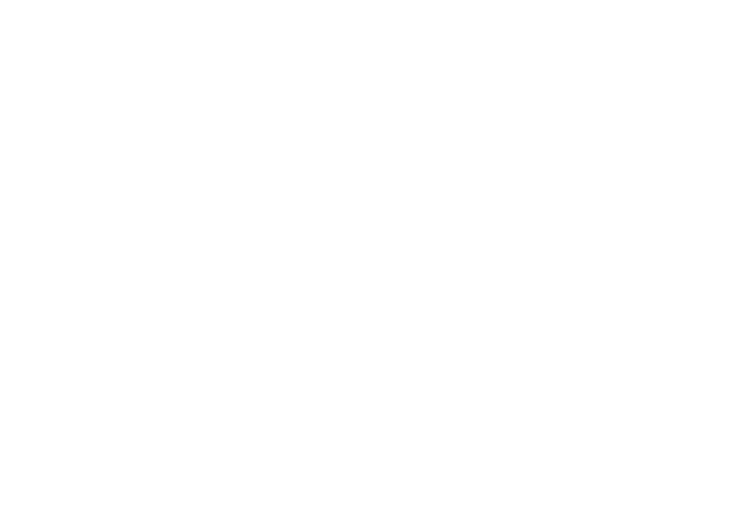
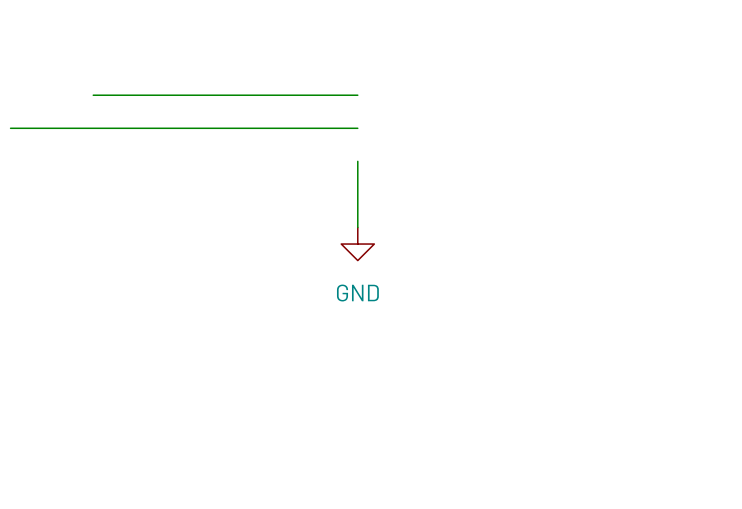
wire: none -> (93, 95) (357, 95)
wire: none -> (10, 128) (357, 128)
wire: none -> (357, 161) (357, 227)
power symbol: none -> GND (357, 244)

